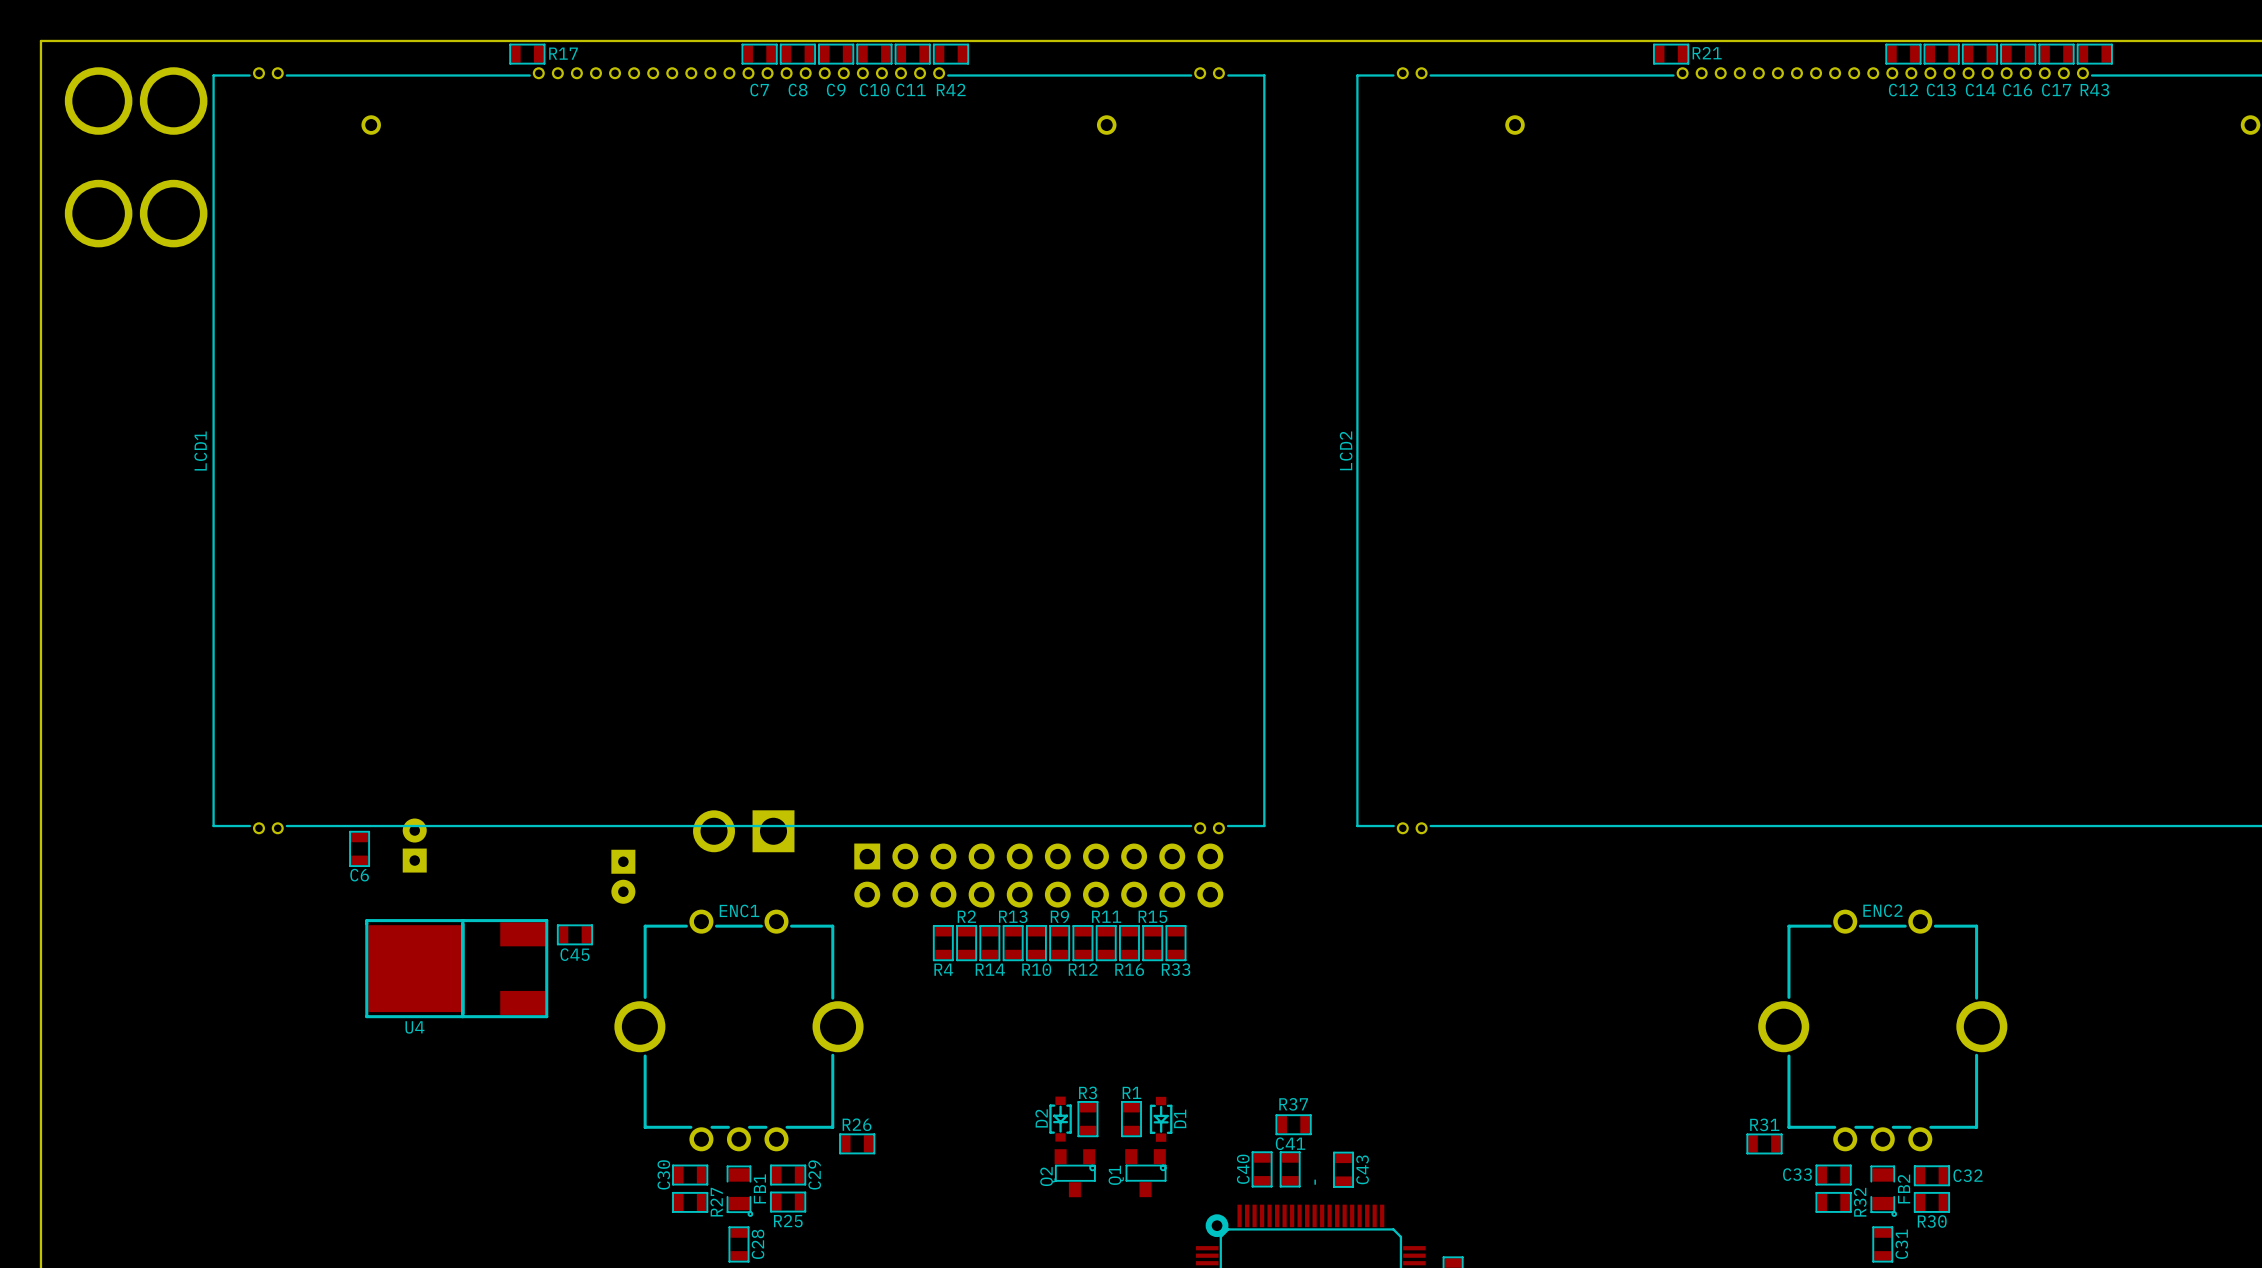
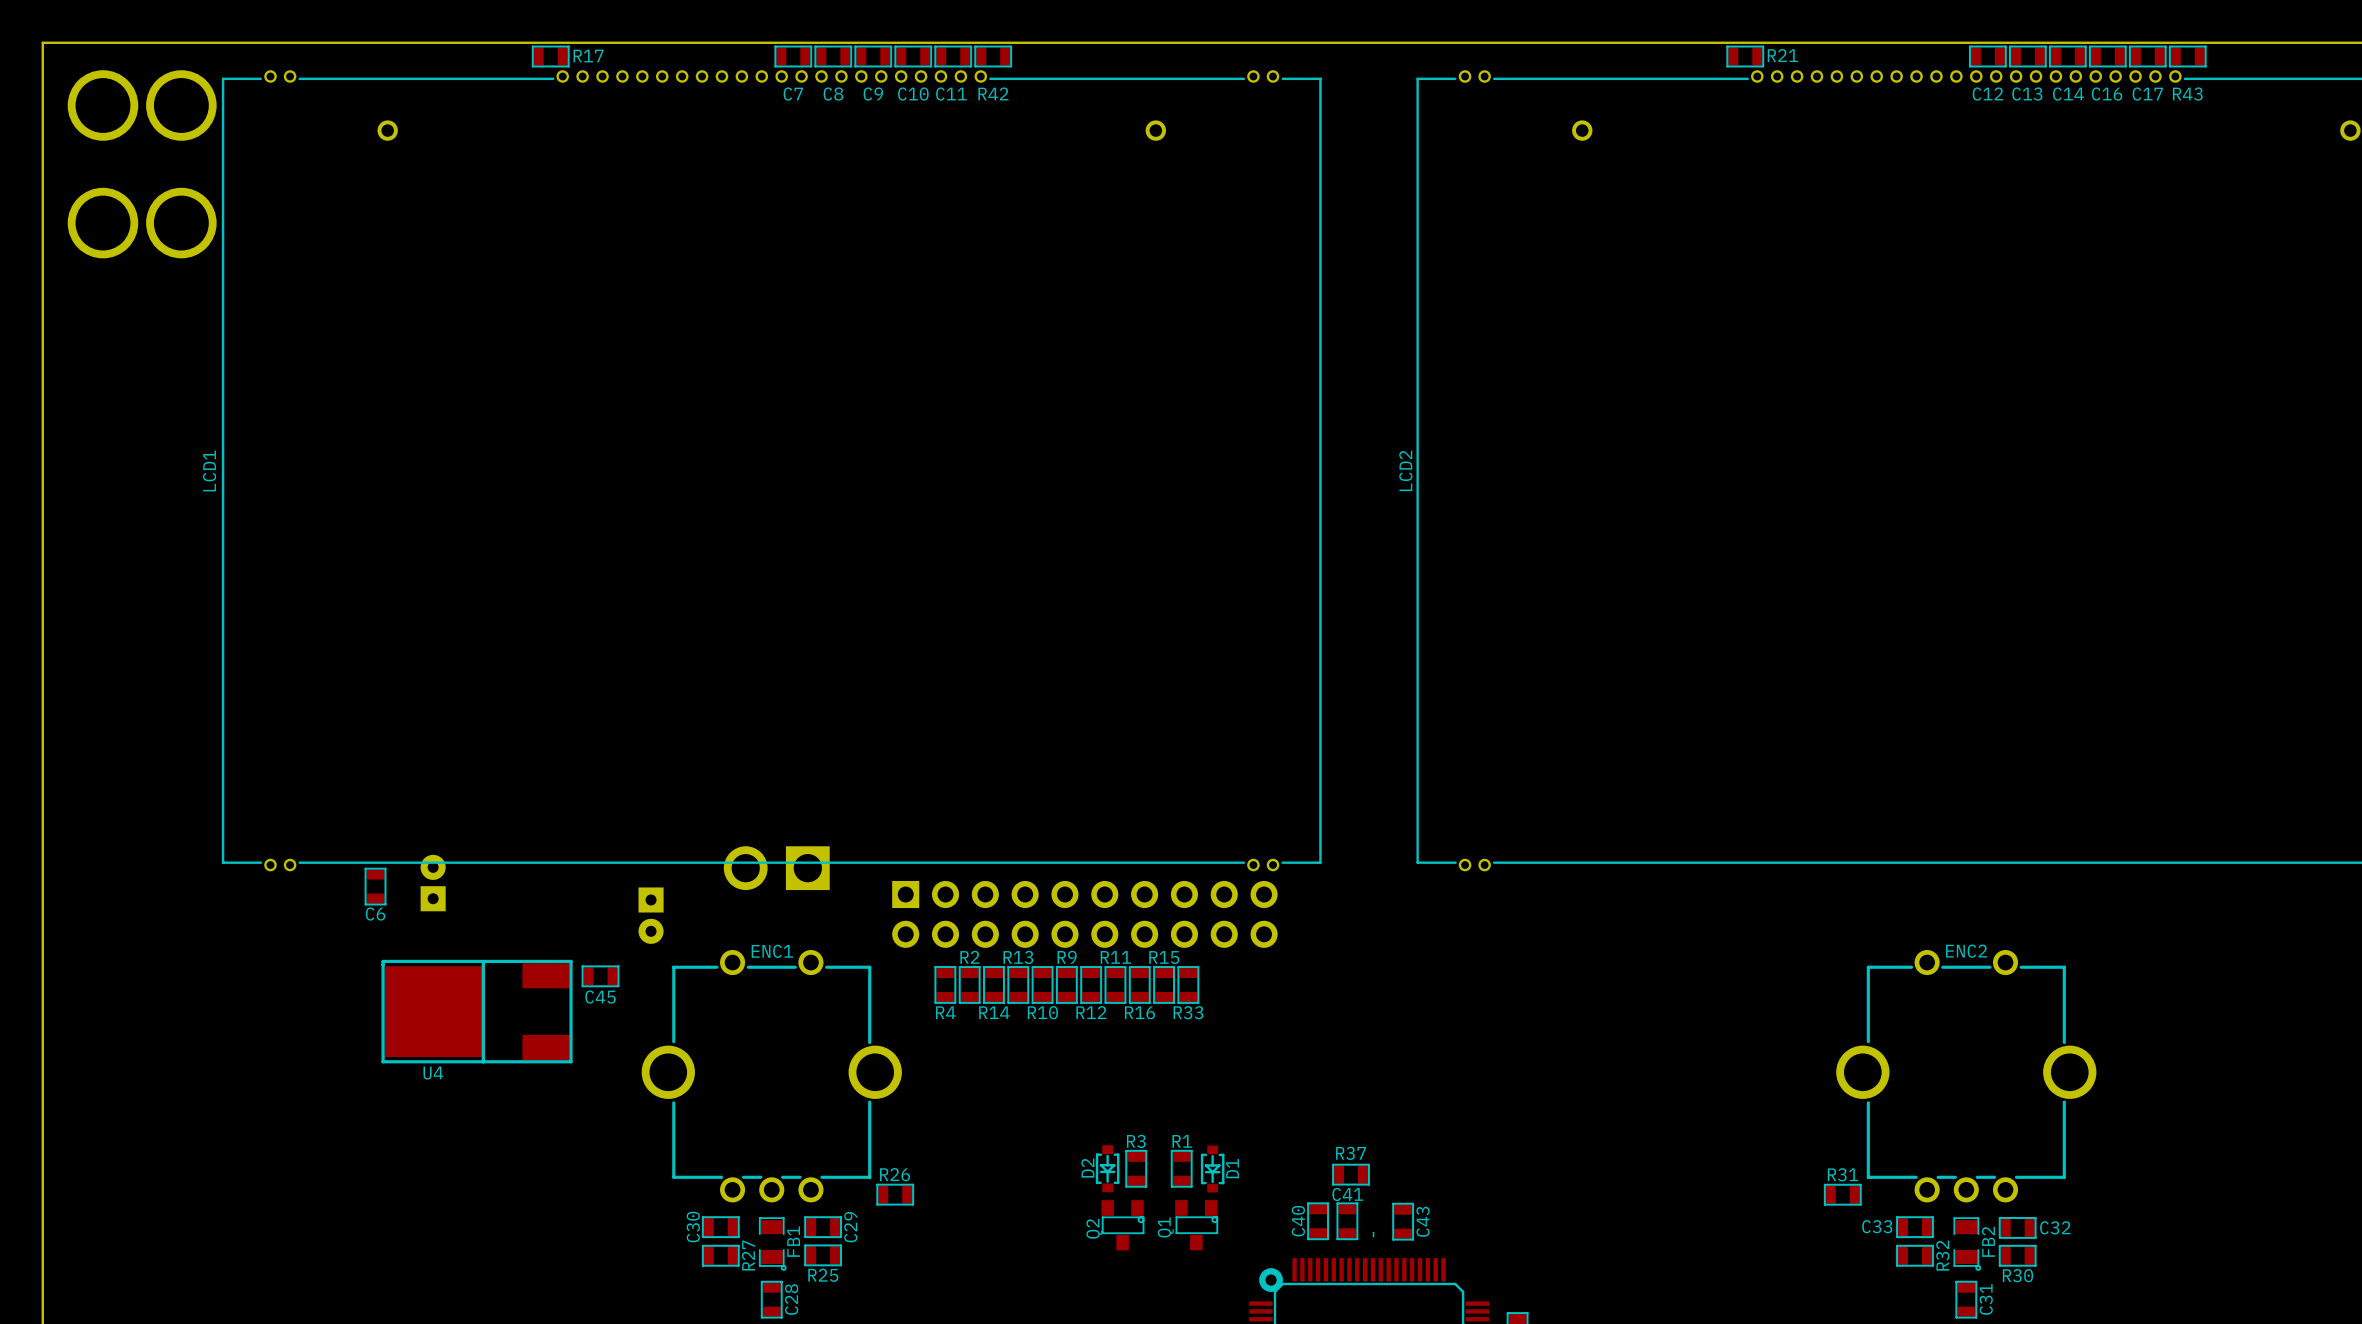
R4 position: (943, 943) -> (945, 984)
R2 position: (966, 943) -> (969, 984)
R14 position: (989, 943) -> (993, 984)
R13 position: (1013, 943) -> (1018, 984)
R10 position: (1036, 943) -> (1042, 984)
R9 position: (1059, 943) -> (1066, 984)
R12 position: (1082, 943) -> (1091, 984)
R11 position: (1106, 943) -> (1115, 984)
R16 position: (1129, 943) -> (1139, 984)
R15 position: (1152, 943) -> (1164, 984)
R33 position: (1176, 943) -> (1188, 984)

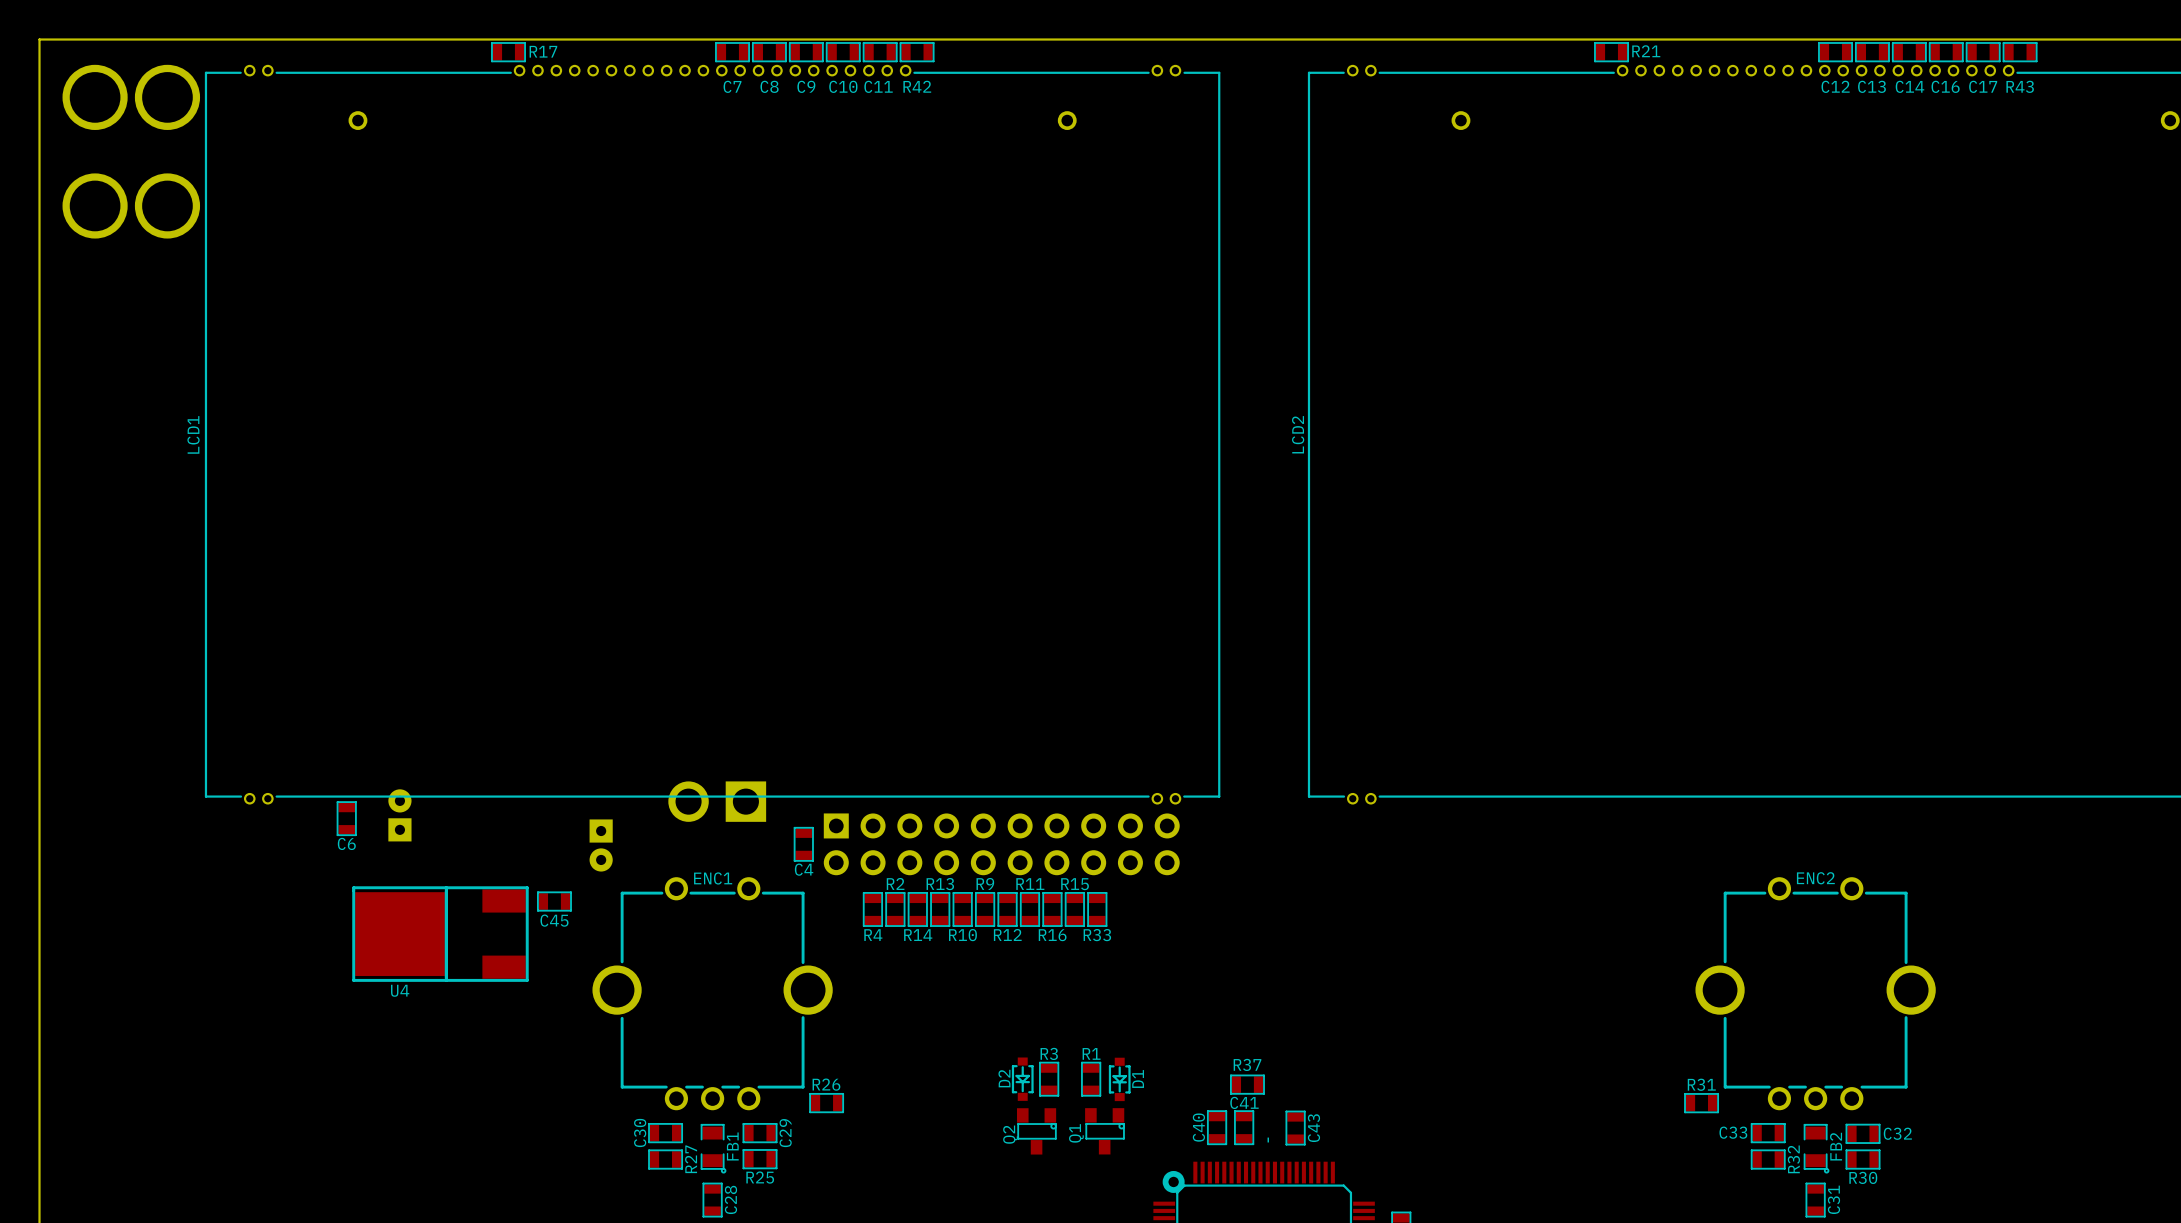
C4: none -> (803, 844)

